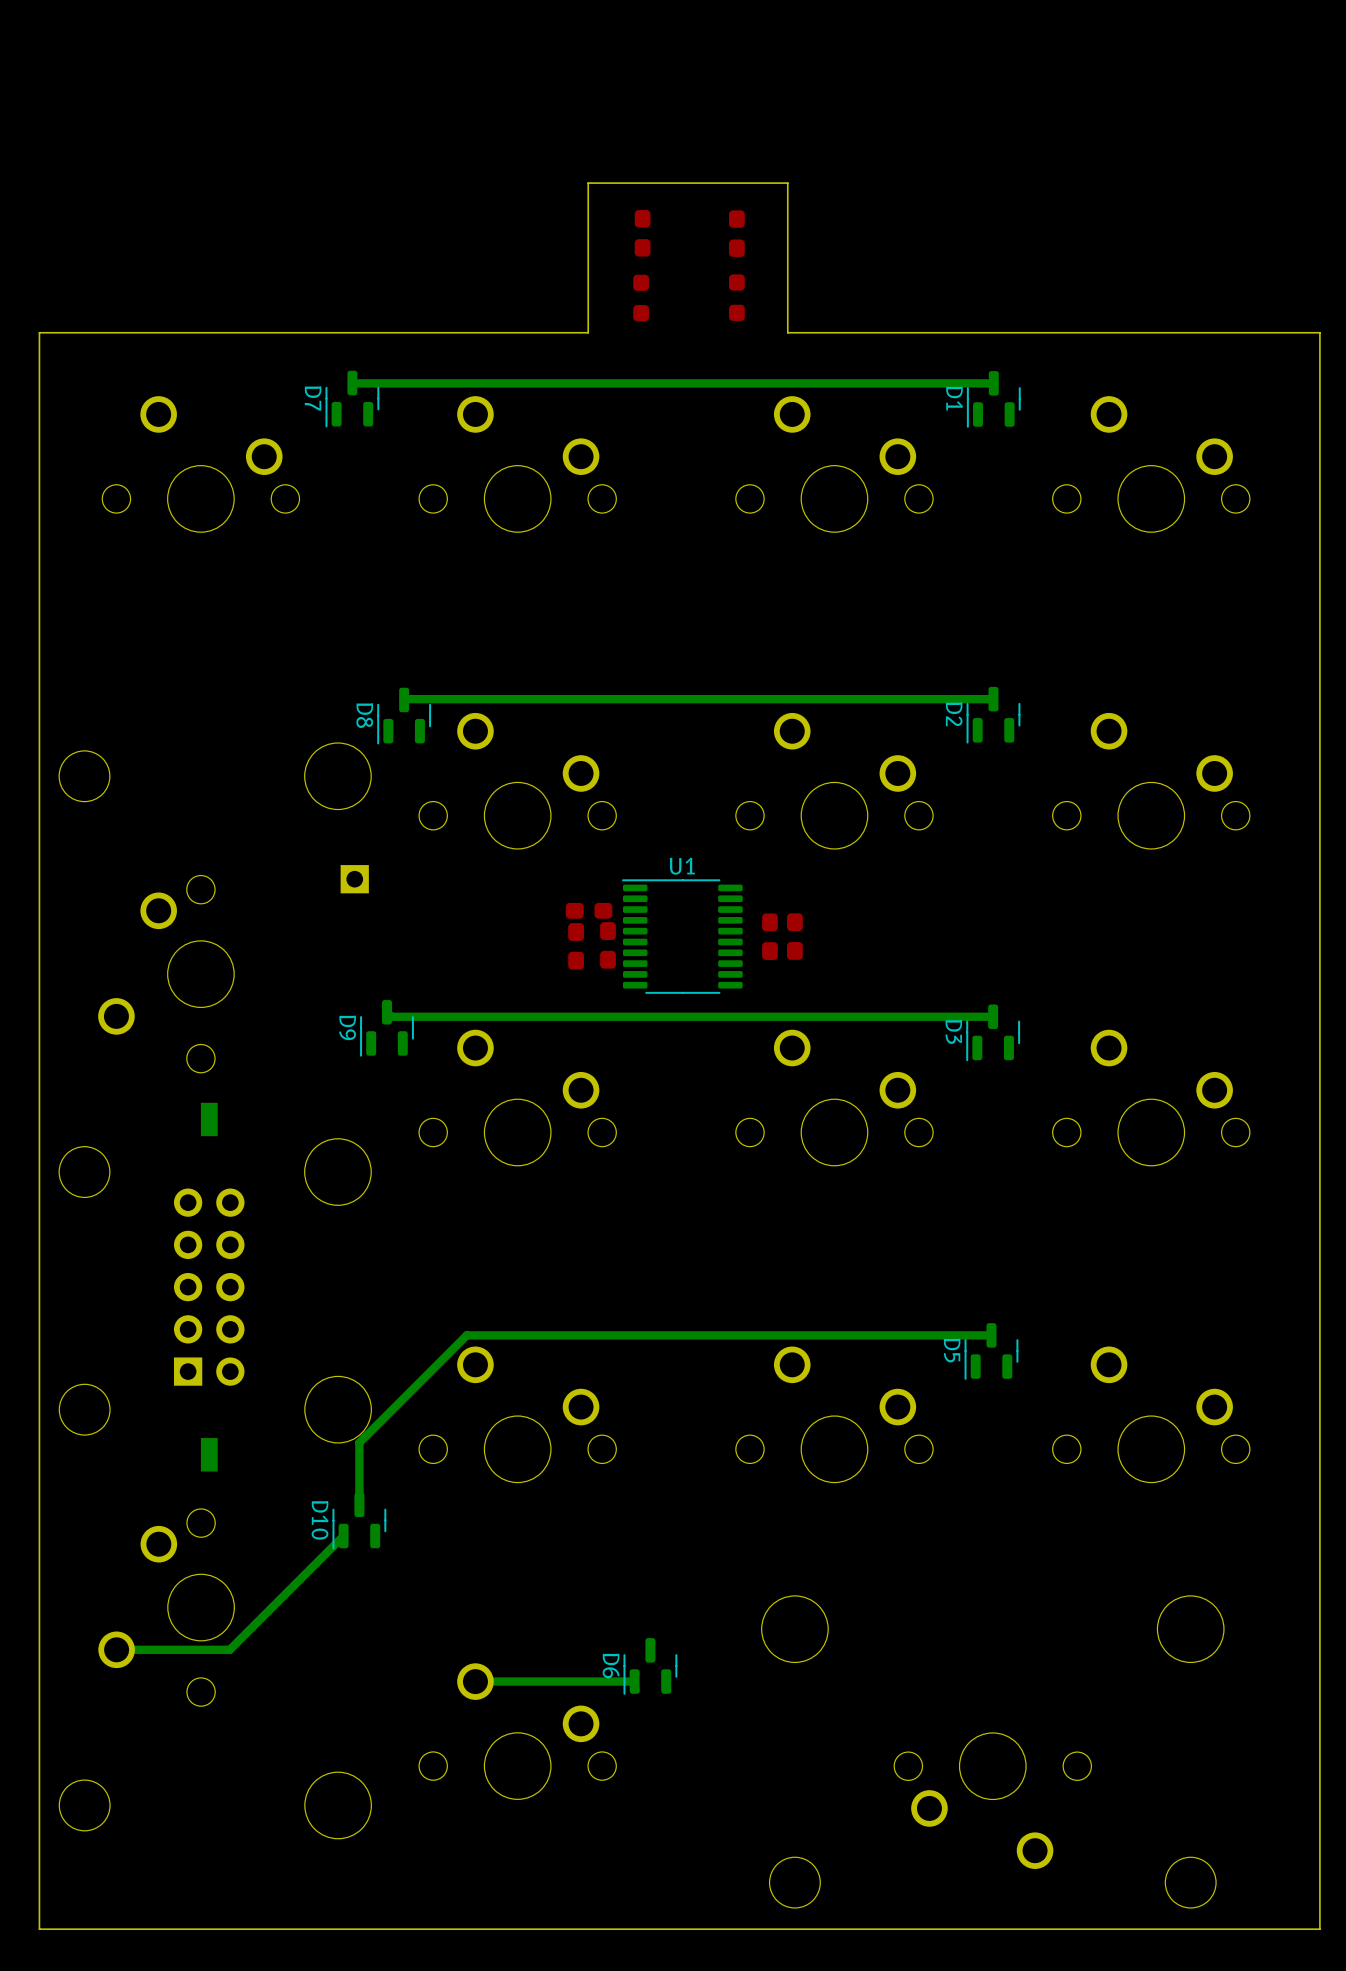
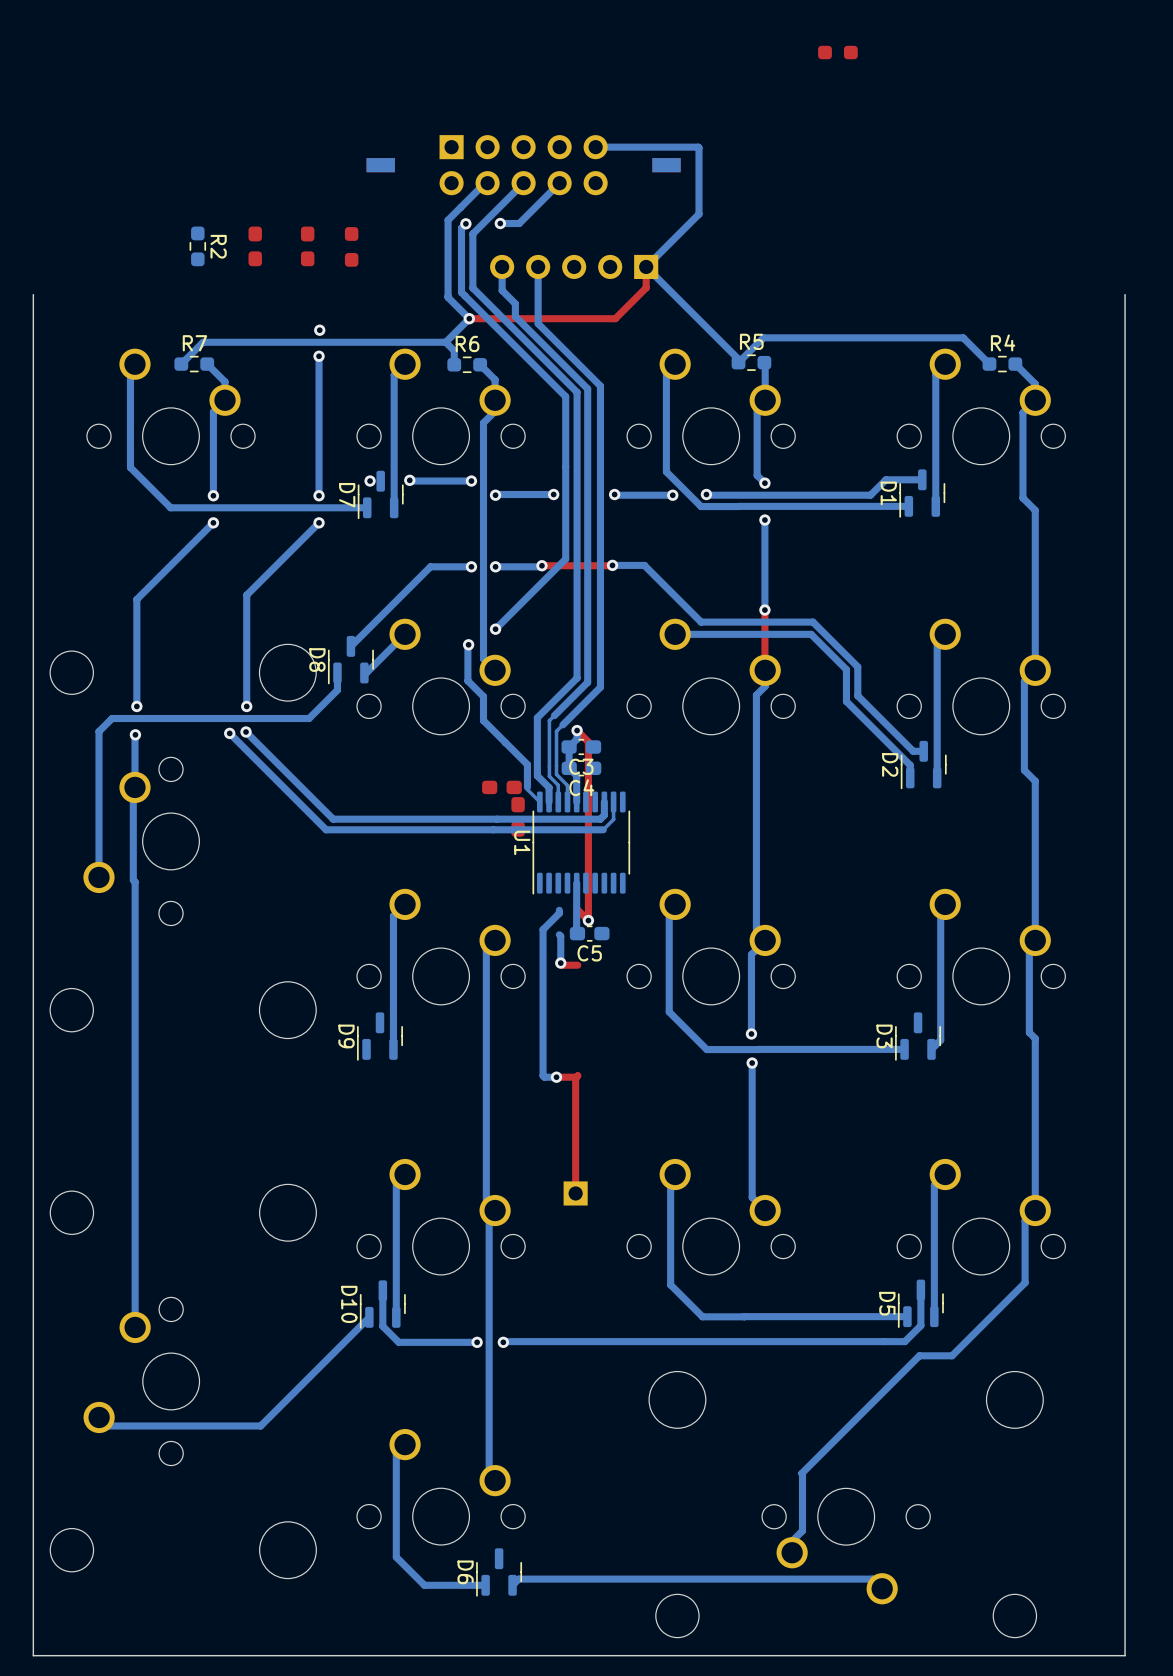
part: none -> (837, 52)
bottom track: none -> (595, 147) (699, 147) (699, 214) (646, 266) (738, 359) (738, 362) (763, 337) (963, 337) (989, 364)
part: none -> (523, 165)
bottom track: none -> (487, 183) (485, 183) (448, 220) (448, 297) (469, 318) (445, 342)
bottom track: none -> (523, 183) (472, 233) (472, 288) (577, 392) (577, 678) (537, 717) (537, 775) (549, 787) (549, 801)
bottom track: none -> (559, 183) (519, 223) (500, 223)
part: (642, 233) -> none
part: (736, 233) -> none
bottom track: none -> (465, 223) (461, 228) (461, 292) (565, 396) (565, 559) (495, 629)
via: none -> (465, 223)
via: none -> (500, 223)
R2: none -> (197, 246)
part: none -> (255, 246)
part: none -> (307, 246)
part: none -> (351, 246)
part: (641, 297) -> none
part: (736, 297) -> none
bottom track: none -> (502, 266) (502, 290) (515, 303) (515, 316) (587, 388) (587, 682) (549, 720) (549, 776) (558, 785) (558, 801)
bottom track: none -> (538, 266) (538, 323) (600, 386) (600, 687) (556, 731) (556, 774) (567, 785) (567, 801)
part: none -> (574, 266)
top track: none -> (646, 266) (646, 287) (615, 318) (469, 318)
board edge: (1319, 332) (787, 332) (787, 183) (588, 183) (588, 332) (39, 332) -> none
via: none -> (469, 318)
via: none -> (319, 330)
bottom track: (352, 383) (993, 383) -> none
bottom track: none -> (445, 342) (203, 342) (181, 364)
bottom track: none -> (445, 342) (454, 350) (454, 364)
D7 position: (352, 399) -> (380, 494)
D1 position: (993, 399) -> (922, 493)
bottom track: none -> (319, 356) (319, 495)
via: none -> (319, 356)
R5: none -> (751, 362)
bottom track: none -> (764, 362) (765, 400) (757, 408) (757, 475) (764, 483)
bottom track: none -> (134, 364) (130, 368) (130, 467) (170, 507) (367, 507)
R7: none -> (194, 364)
bottom track: none -> (207, 364) (225, 381) (225, 400) (213, 411) (213, 495)
bottom track: none -> (405, 364) (394, 375) (394, 507)
bottom track: none -> (675, 364) (666, 373) (666, 471) (701, 506) (738, 506)
bottom track: none -> (945, 364) (935, 373) (935, 506)
R4: none -> (1002, 364)
bottom track: none -> (1015, 364) (1035, 384) (1035, 400) (1022, 412) (1022, 498) (1035, 510) (1035, 670) (1024, 681) (1024, 770) (1035, 781) (1035, 940) (1029, 946) (1029, 1032) (1035, 1038) (1035, 1210) (1025, 1220) (1025, 1282) (952, 1355) (919, 1355) (801, 1473) (802, 1530) (792, 1541) (792, 1552)
R6: none -> (467, 364)
bottom track: none -> (480, 364) (495, 379) (495, 411) (483, 422) (483, 658) (495, 670)
bottom track: none -> (922, 479) (885, 479) (870, 495) (706, 494)
bottom track: none -> (409, 480) (471, 481)
via: none -> (409, 480)
via: none -> (370, 481)
via: none -> (471, 481)
via: none -> (764, 483)
bottom track: none -> (553, 494) (495, 495)
via: none -> (553, 494)
bottom track: none -> (614, 494) (672, 495)
via: none -> (614, 494)
via: none -> (706, 494)
via: none -> (213, 495)
via: none -> (319, 495)
via: none -> (495, 495)
via: none -> (672, 495)
bottom track: none -> (908, 506) (738, 506)
bottom track: none -> (764, 520) (764, 610)
via: none -> (764, 520)
bottom track: none -> (213, 522) (136, 599) (136, 706)
via: none -> (213, 522)
bottom track: none -> (319, 522) (246, 595) (246, 706)
via: none -> (319, 522)
bottom track: none -> (541, 565) (495, 566)
via: none -> (541, 565)
bottom track: none -> (612, 565) (644, 565) (701, 622) (812, 622) (857, 666) (857, 695) (913, 751) (923, 751)
top track: none -> (612, 565) (541, 565)
via: none -> (612, 565)
bottom track: none -> (471, 566) (430, 566) (350, 646)
via: none -> (471, 566)
via: none -> (495, 566)
bottom track: (993, 699) (404, 699) -> none
top track: none -> (764, 610) (765, 670)
via: none -> (764, 610)
D2 position: (993, 715) -> (923, 765)
D8 position: (404, 716) -> (350, 660)
via: none -> (495, 629)
bottom track: none -> (405, 634) (364, 672)
bottom track: none -> (675, 634) (811, 634) (846, 669) (846, 701) (910, 765) (910, 777)
bottom track: none -> (945, 634) (937, 642) (937, 777)
bottom track: none -> (468, 644) (467, 680) (483, 696) (483, 720) (527, 764) (527, 789) (539, 801)
via: none -> (468, 644)
bottom track: none -> (765, 670) (765, 686) (756, 695) (756, 931) (765, 940) (751, 954) (751, 1033)
bottom track: none -> (337, 672) (337, 690) (309, 718) (112, 718) (98, 731) (98, 877)
via: none -> (136, 706)
via: none -> (246, 706)
bottom track: none -> (577, 730) (577, 739) (569, 747) (569, 768) (576, 775) (576, 801)
top track: none -> (577, 730) (588, 741) (588, 920) (577, 909)
via: none -> (577, 730)
bottom track: none -> (246, 731) (333, 819) (600, 819) (604, 815) (604, 801)
via: none -> (246, 731)
bottom track: none -> (229, 733) (326, 829) (603, 829) (613, 819) (613, 801)
via: none -> (229, 733)
bottom track: none -> (135, 734) (135, 787) (133, 789) (133, 880) (135, 881) (135, 1327)
via: none -> (135, 734)
part: (354, 879) -> none
U1 rotation: 0° (682, 936) -> 90° counterclockwise (581, 843)
C4 side: top (769, 936) -> bottom (581, 768)
C3 side: top (794, 936) -> bottom (581, 747)
C5 side: top (576, 946) -> bottom (589, 933)
bottom track: (387, 1012) (391, 1016) (993, 1016) -> none
bottom track: none -> (576, 883) (576, 932)
D9 position: (387, 1028) -> (380, 1036)
D3 position: (993, 1032) -> (918, 1036)
bottom track: none -> (405, 904) (393, 916) (393, 1049)
bottom track: none -> (675, 904) (669, 910) (669, 1012) (706, 1049) (758, 1049)
bottom track: none -> (945, 904) (940, 908) (940, 1040) (931, 1049)
bottom track: none -> (559, 910) (559, 913) (543, 929) (543, 1075) (556, 1077)
via: none -> (588, 920)
bottom track: none -> (559, 934) (560, 963)
bottom track: none -> (495, 940) (486, 949) (486, 1201) (495, 1210) (489, 1216) (489, 1474) (495, 1480)
top track: none -> (560, 963) (562, 965) (577, 965)
via: none -> (560, 963)
via: none -> (751, 1033)
bottom track: none -> (904, 1049) (758, 1049)
bottom track: none -> (752, 1063) (752, 1197) (765, 1210)
via: none -> (752, 1063)
top track: none -> (577, 1075) (575, 1077) (575, 1193)
via: none -> (556, 1077)
top track: none -> (576, 1077) (556, 1077)
part: (209, 1287) -> none
bottom track: (991, 1335) (466, 1335) (359, 1442) (359, 1504) -> none
D5 position: (991, 1351) -> (920, 1303)
bottom track: none -> (405, 1174) (396, 1183) (396, 1317)
bottom track: none -> (675, 1174) (670, 1179) (670, 1284) (702, 1316) (744, 1316)
bottom track: none -> (945, 1174) (934, 1185) (934, 1316)
part: none -> (575, 1193)
bottom track: none -> (920, 1290) (920, 1325) (904, 1341) (503, 1342)
bottom track: none -> (382, 1290) (382, 1326) (398, 1342) (477, 1342)
D10 position: (359, 1520) -> (382, 1304)
bottom track: none -> (907, 1316) (744, 1316)
bottom track: (343, 1536) (229, 1649) (116, 1649) -> (369, 1317) (260, 1425) (107, 1425) (99, 1417)
via: none -> (477, 1342)
via: none -> (503, 1342)
D6 position: (650, 1666) -> (499, 1572)
bottom track: (634, 1681) (475, 1681) -> (485, 1585) (424, 1585) (396, 1557) (396, 1453) (405, 1444)
bottom track: none -> (512, 1585) (518, 1579) (872, 1579) (882, 1588)

